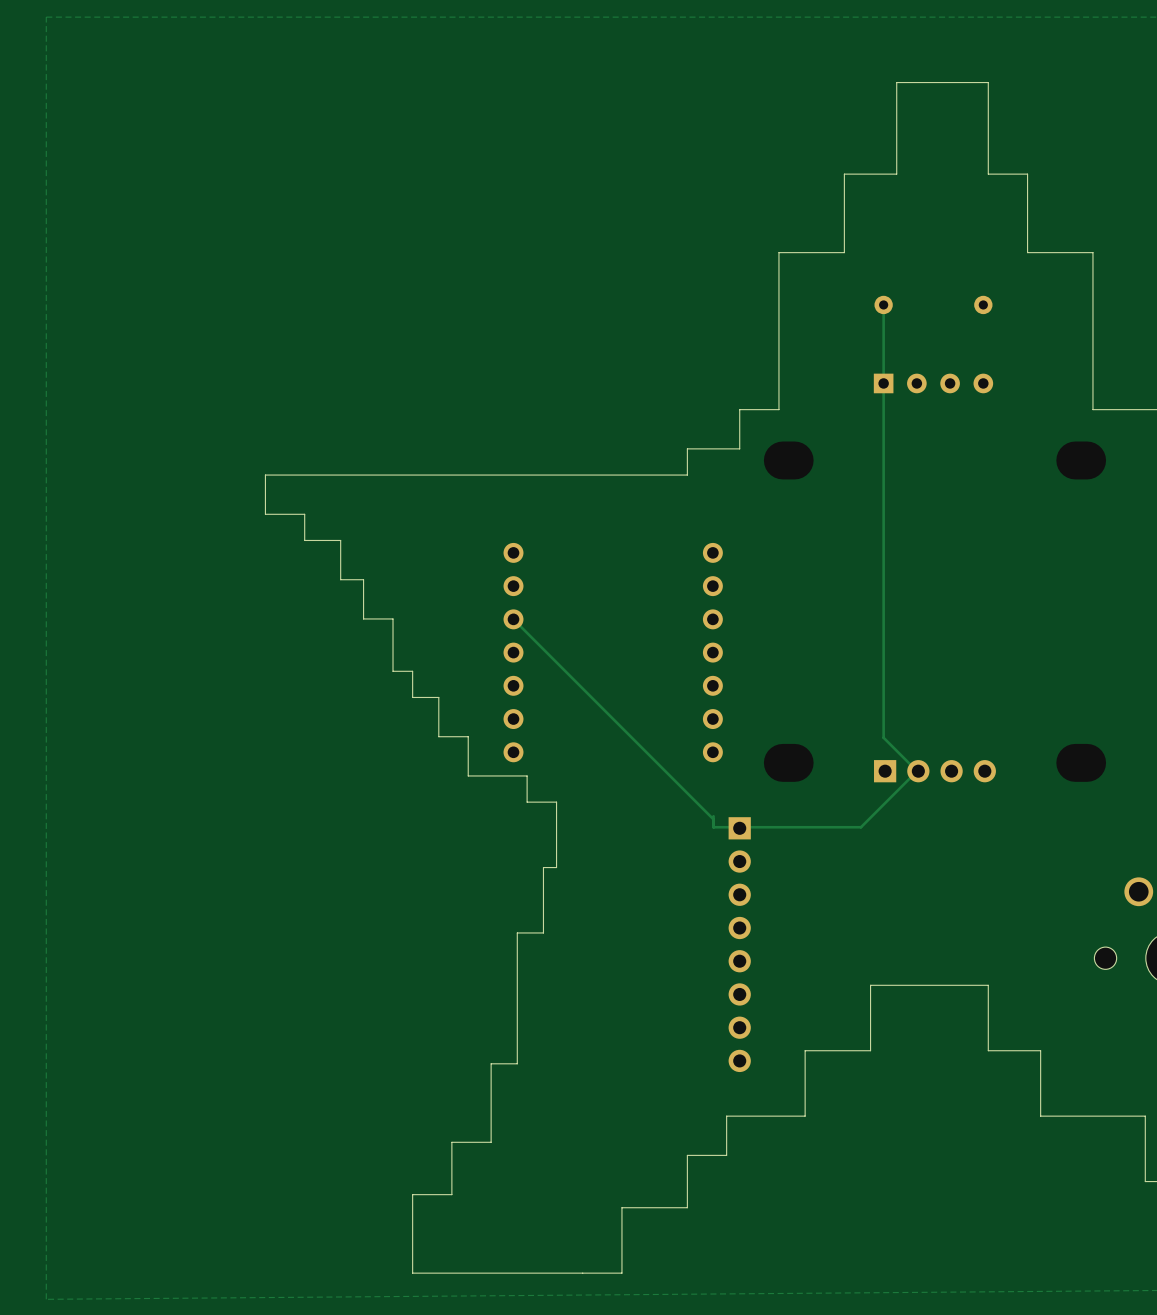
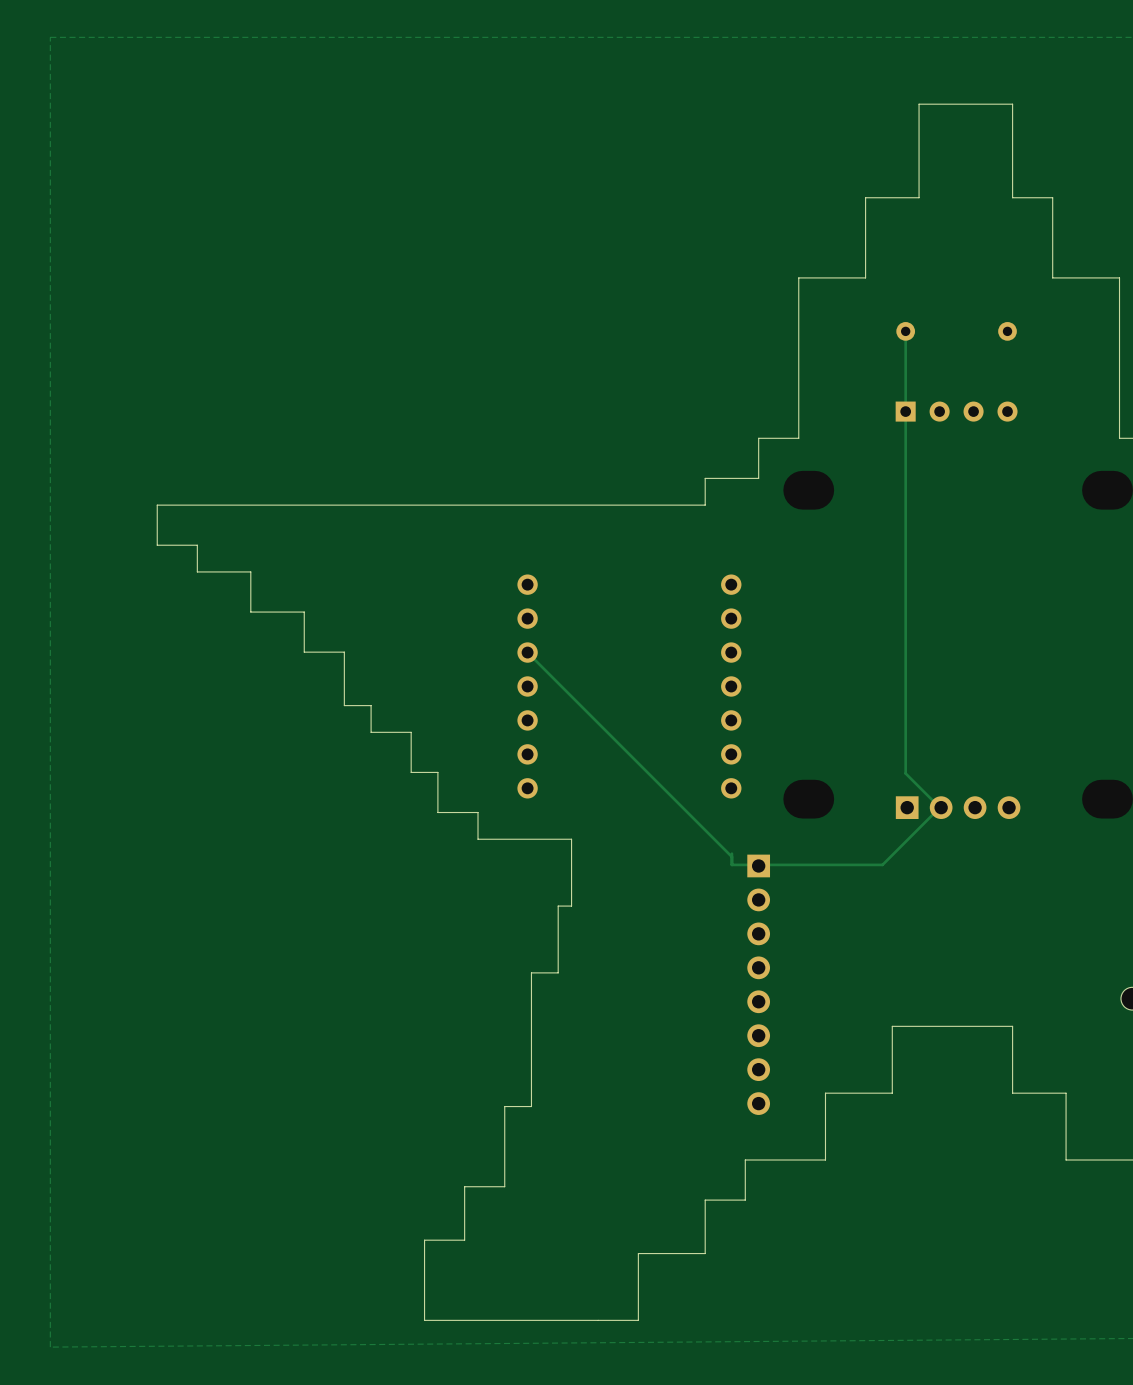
board edge: (265, 475) (265, 514) (304, 514) (304, 540) (340, 540) (340, 579) (363, 579) (363, 618) (393, 618) (393, 671) (412, 671) (412, 697) (438, 697) (438, 736) (468, 736) (468, 775) (527, 775) (527, 802) -> (274, 505) (157, 505) (157, 545) (197, 545) (197, 571) (250, 571) (250, 612) (304, 612) (304, 652) (344, 652) (344, 705) (371, 705) (371, 732) (411, 732) (411, 772) (437, 772) (437, 812) (478, 812) (478, 839) (541, 839)

